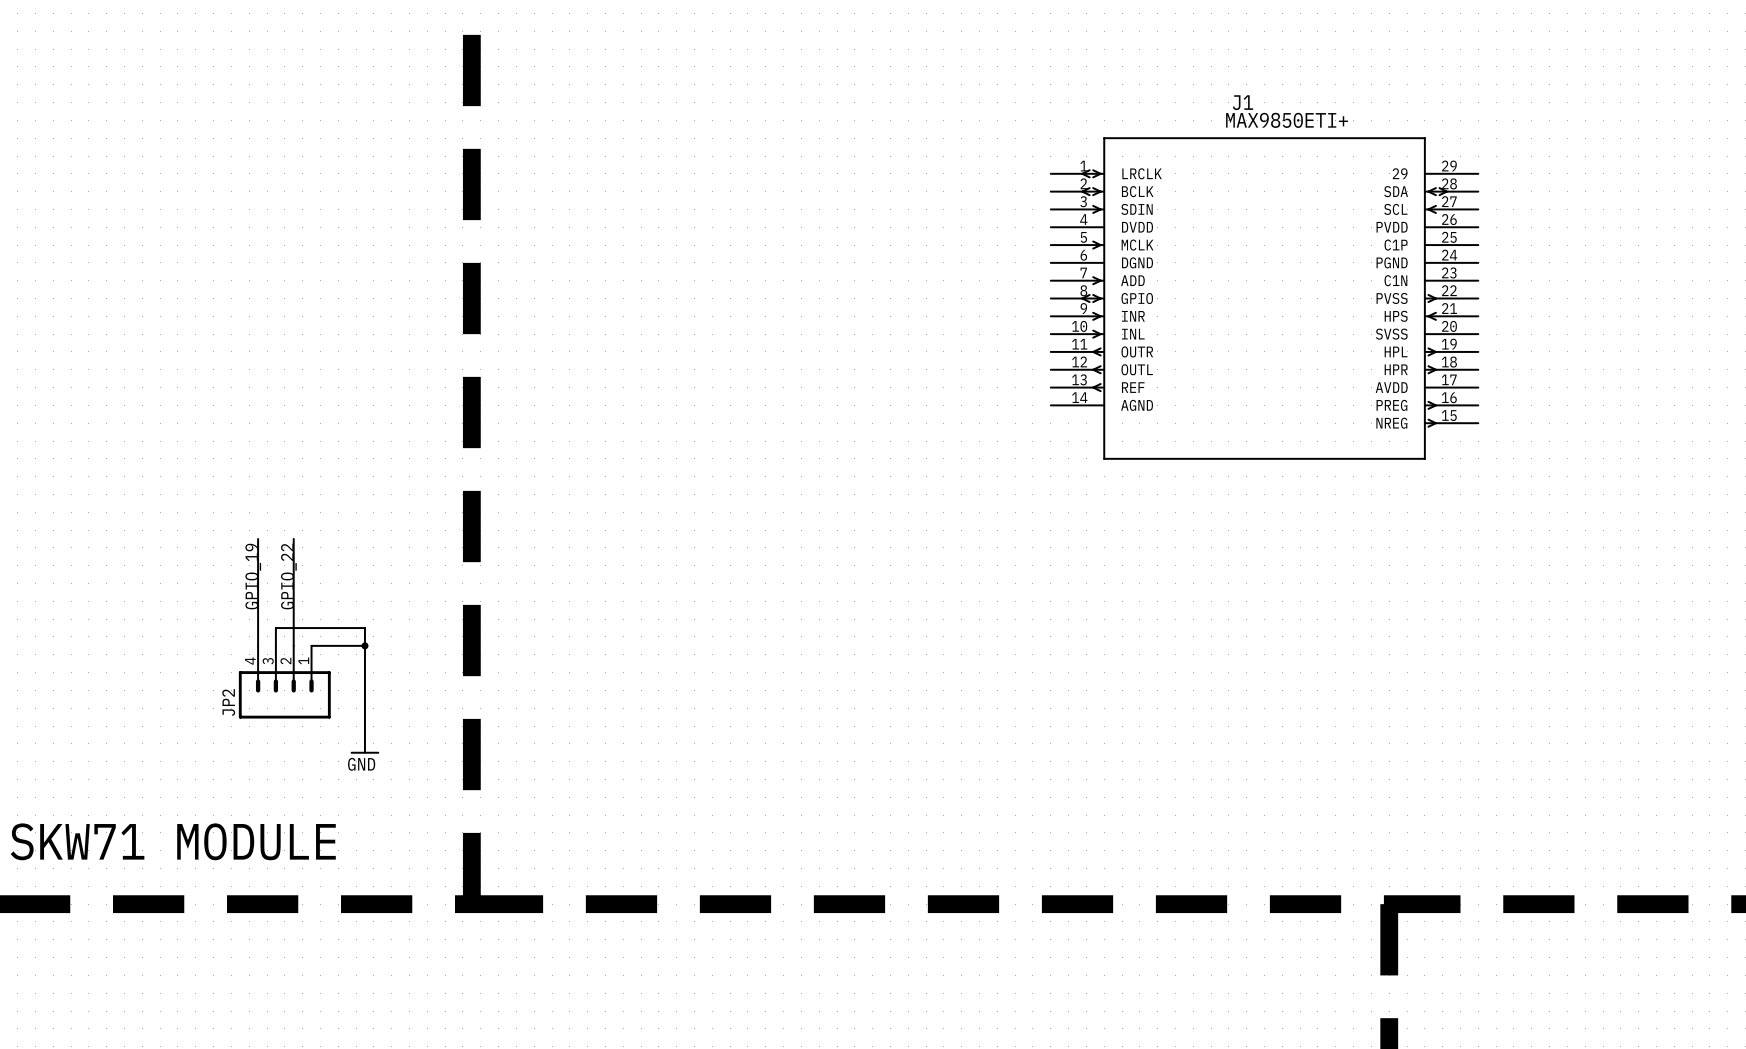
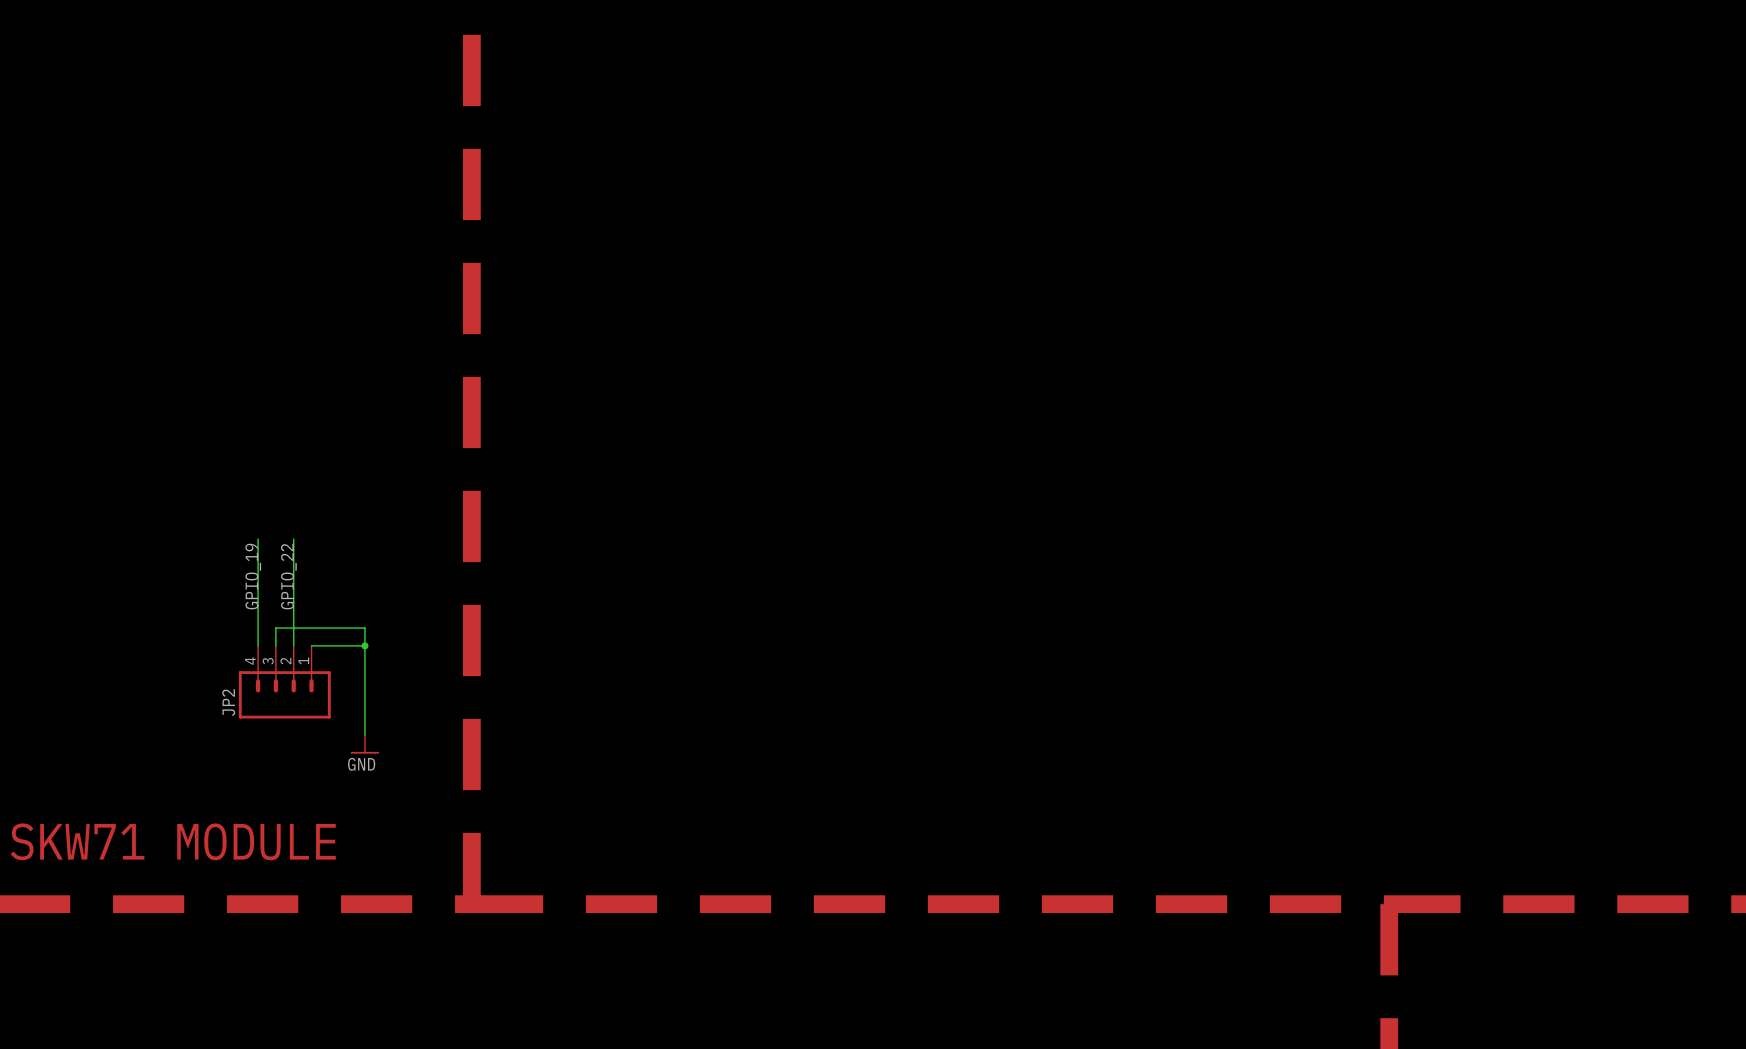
J1: MAX9850ETI+ (1264, 298) -> none

